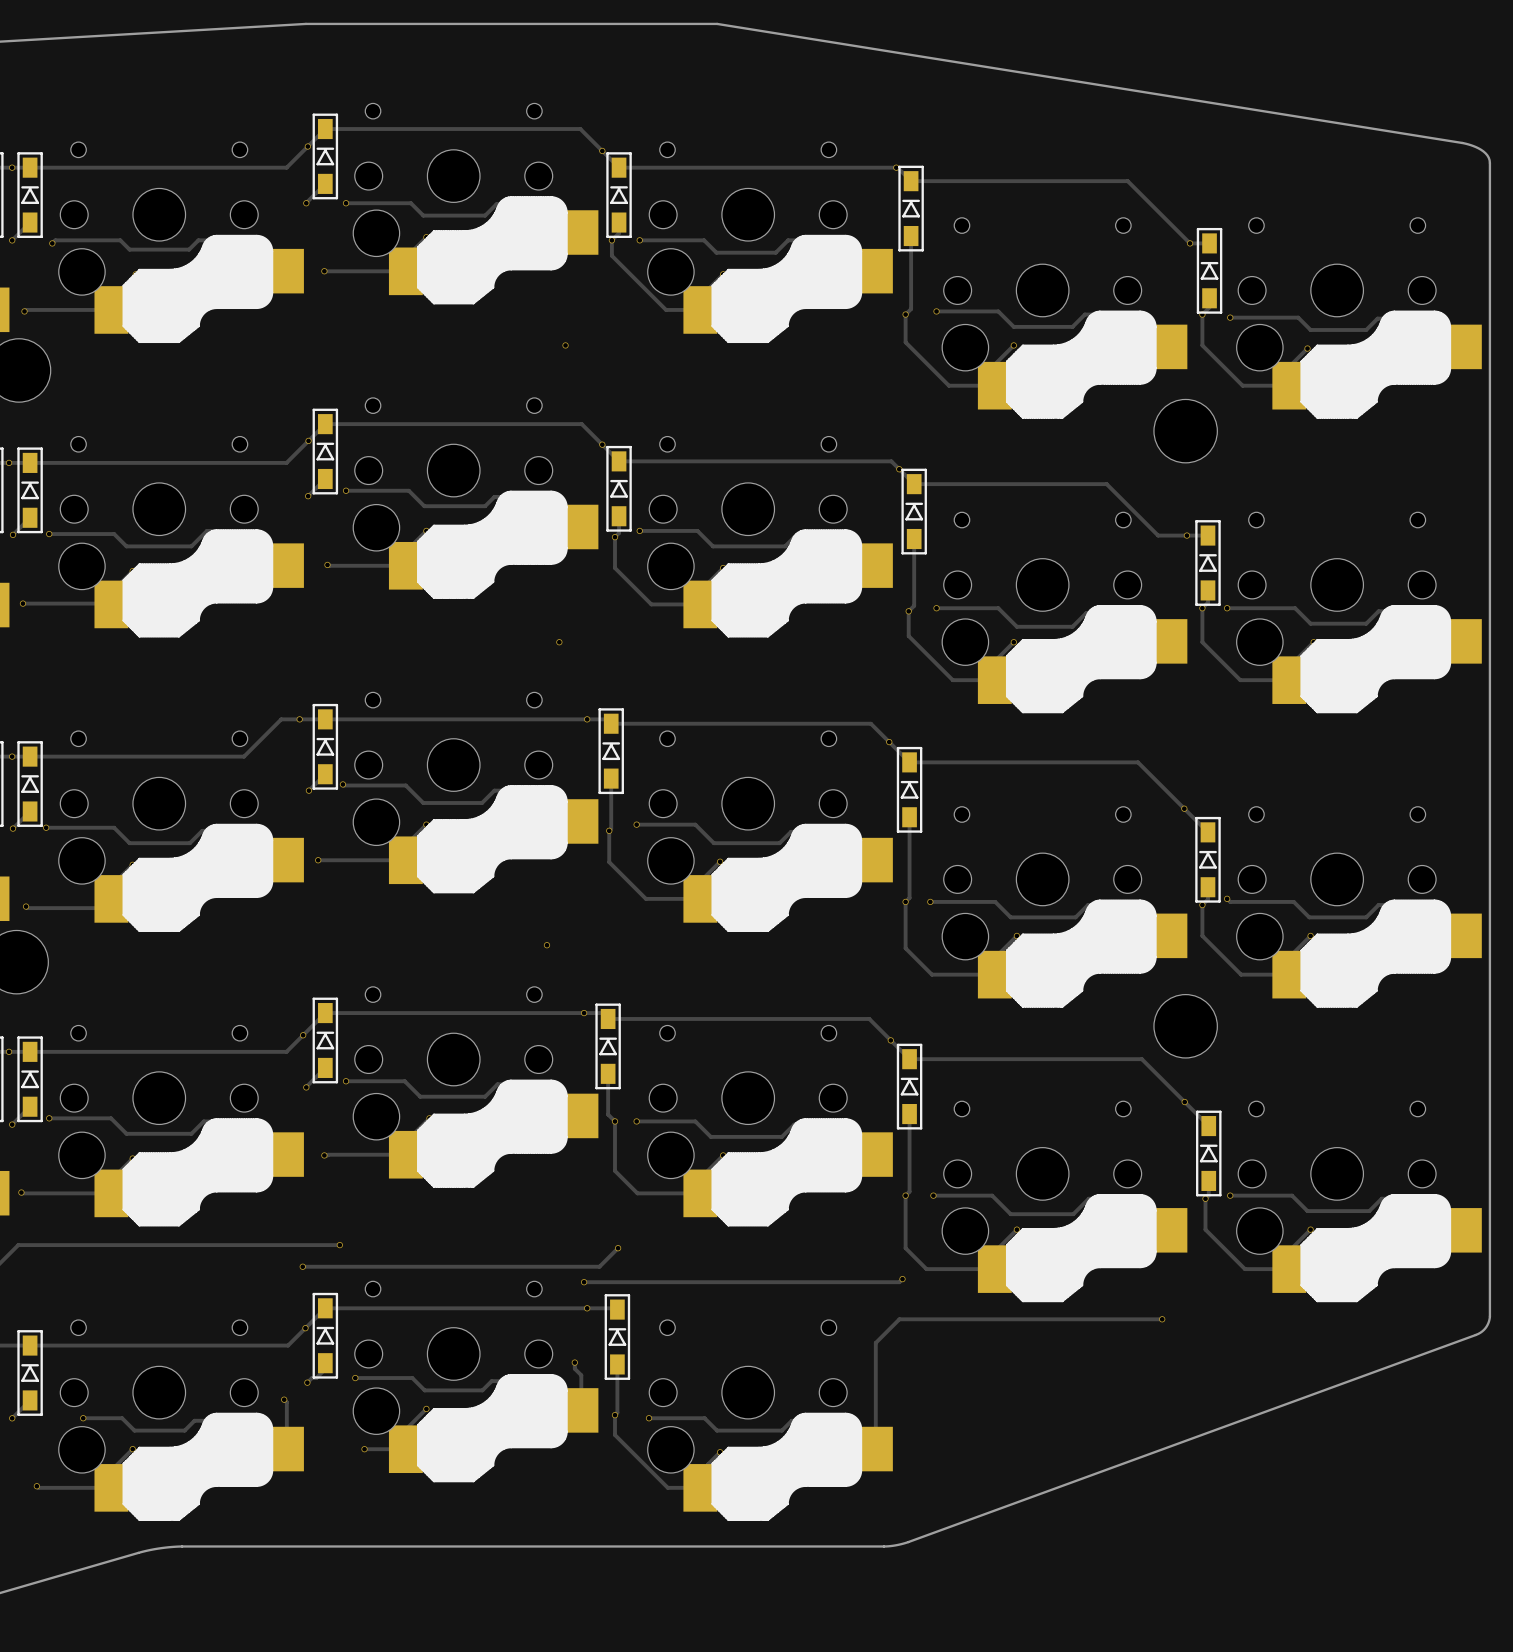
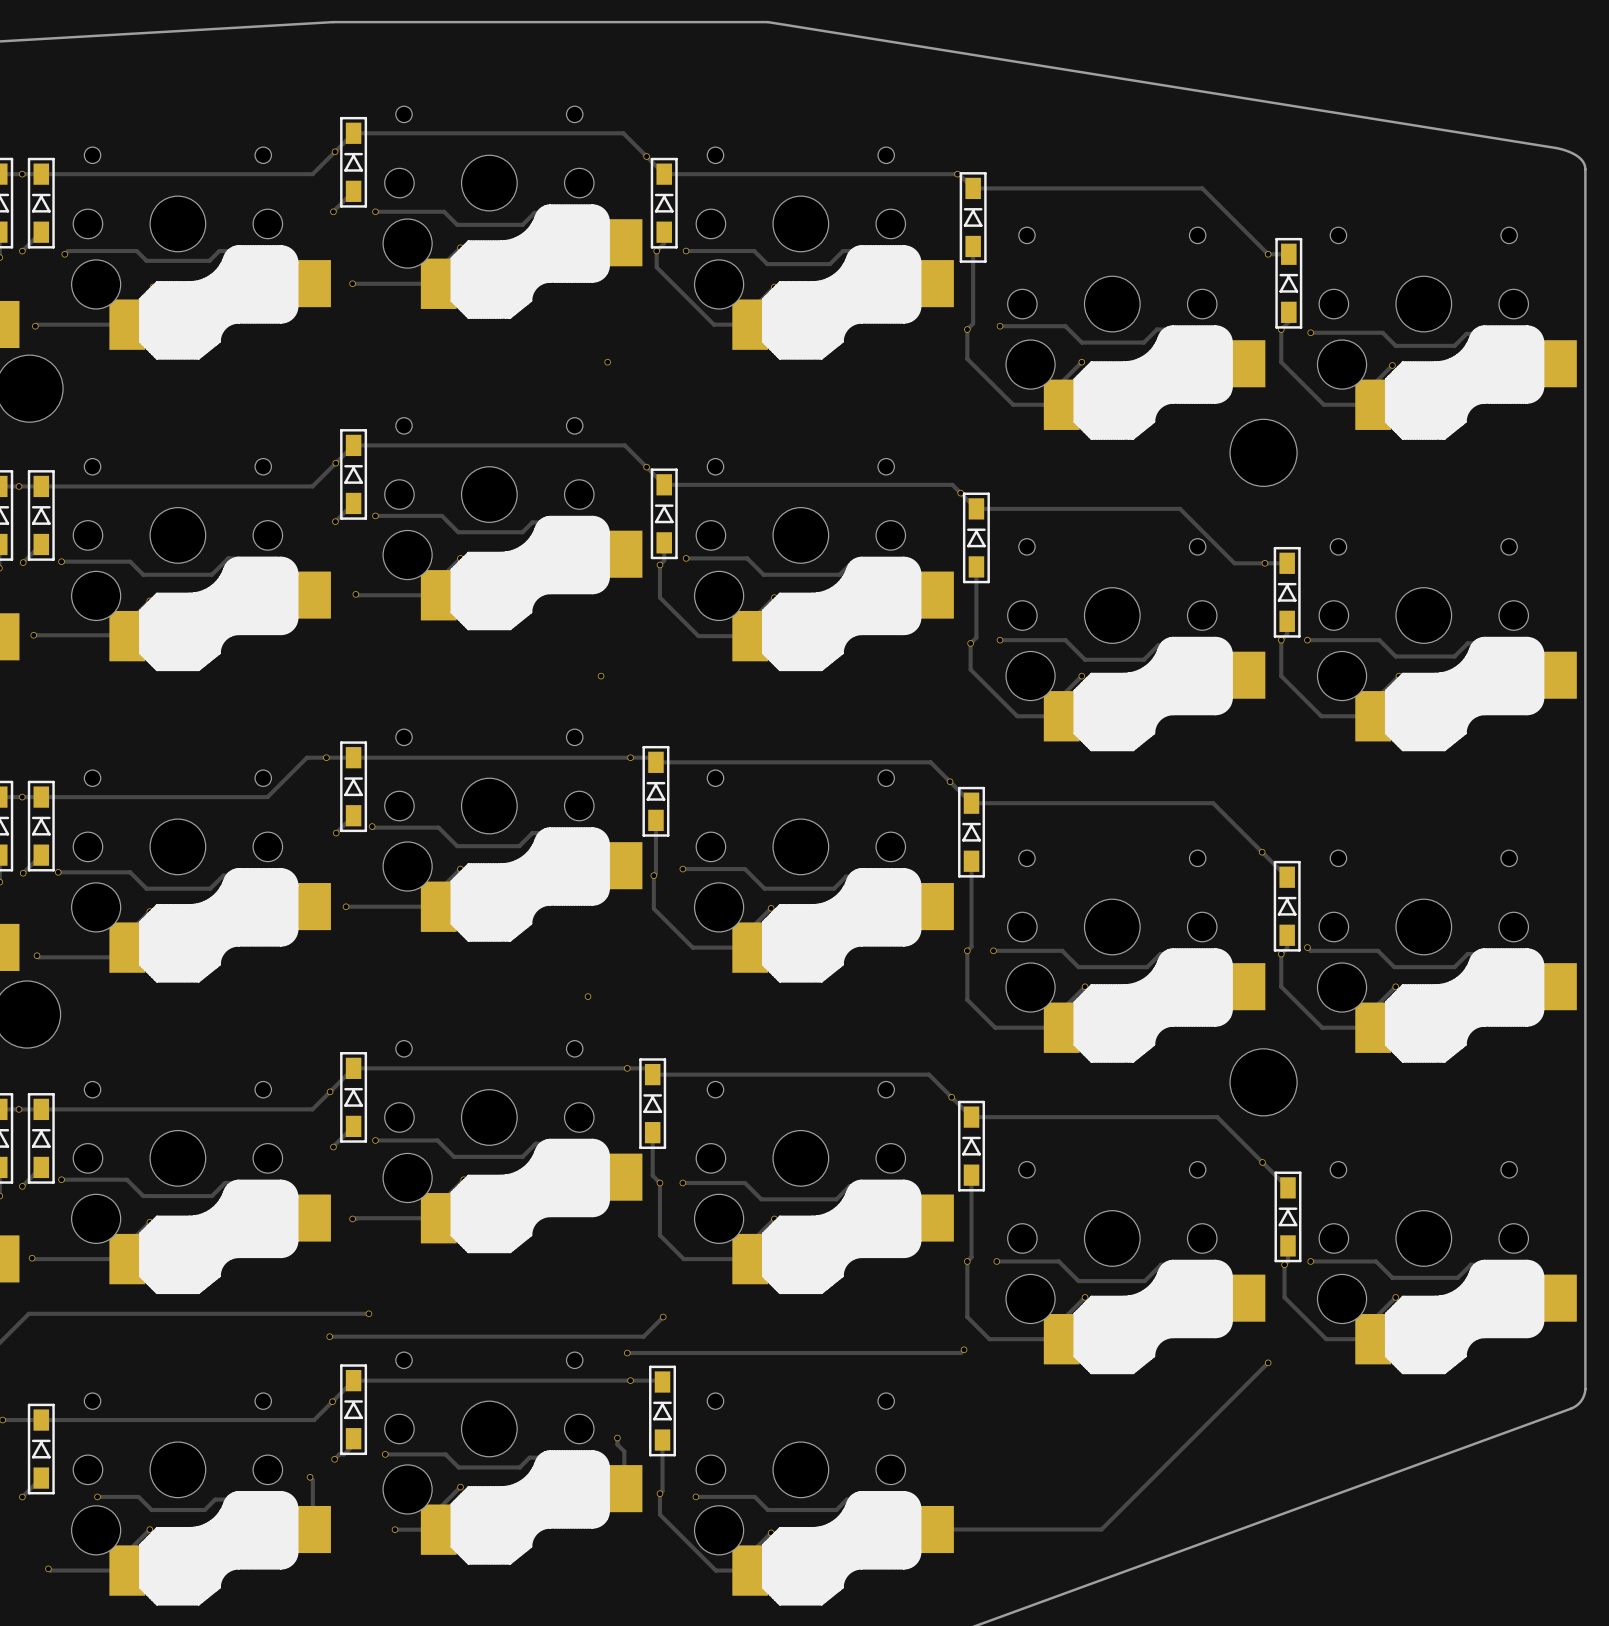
track: (1162, 1319) (899, 1319) (875, 1342) (875, 1449) -> (1268, 1362) (1101, 1529) (935, 1529)
via position: (1162, 1319) -> (1268, 1362)

